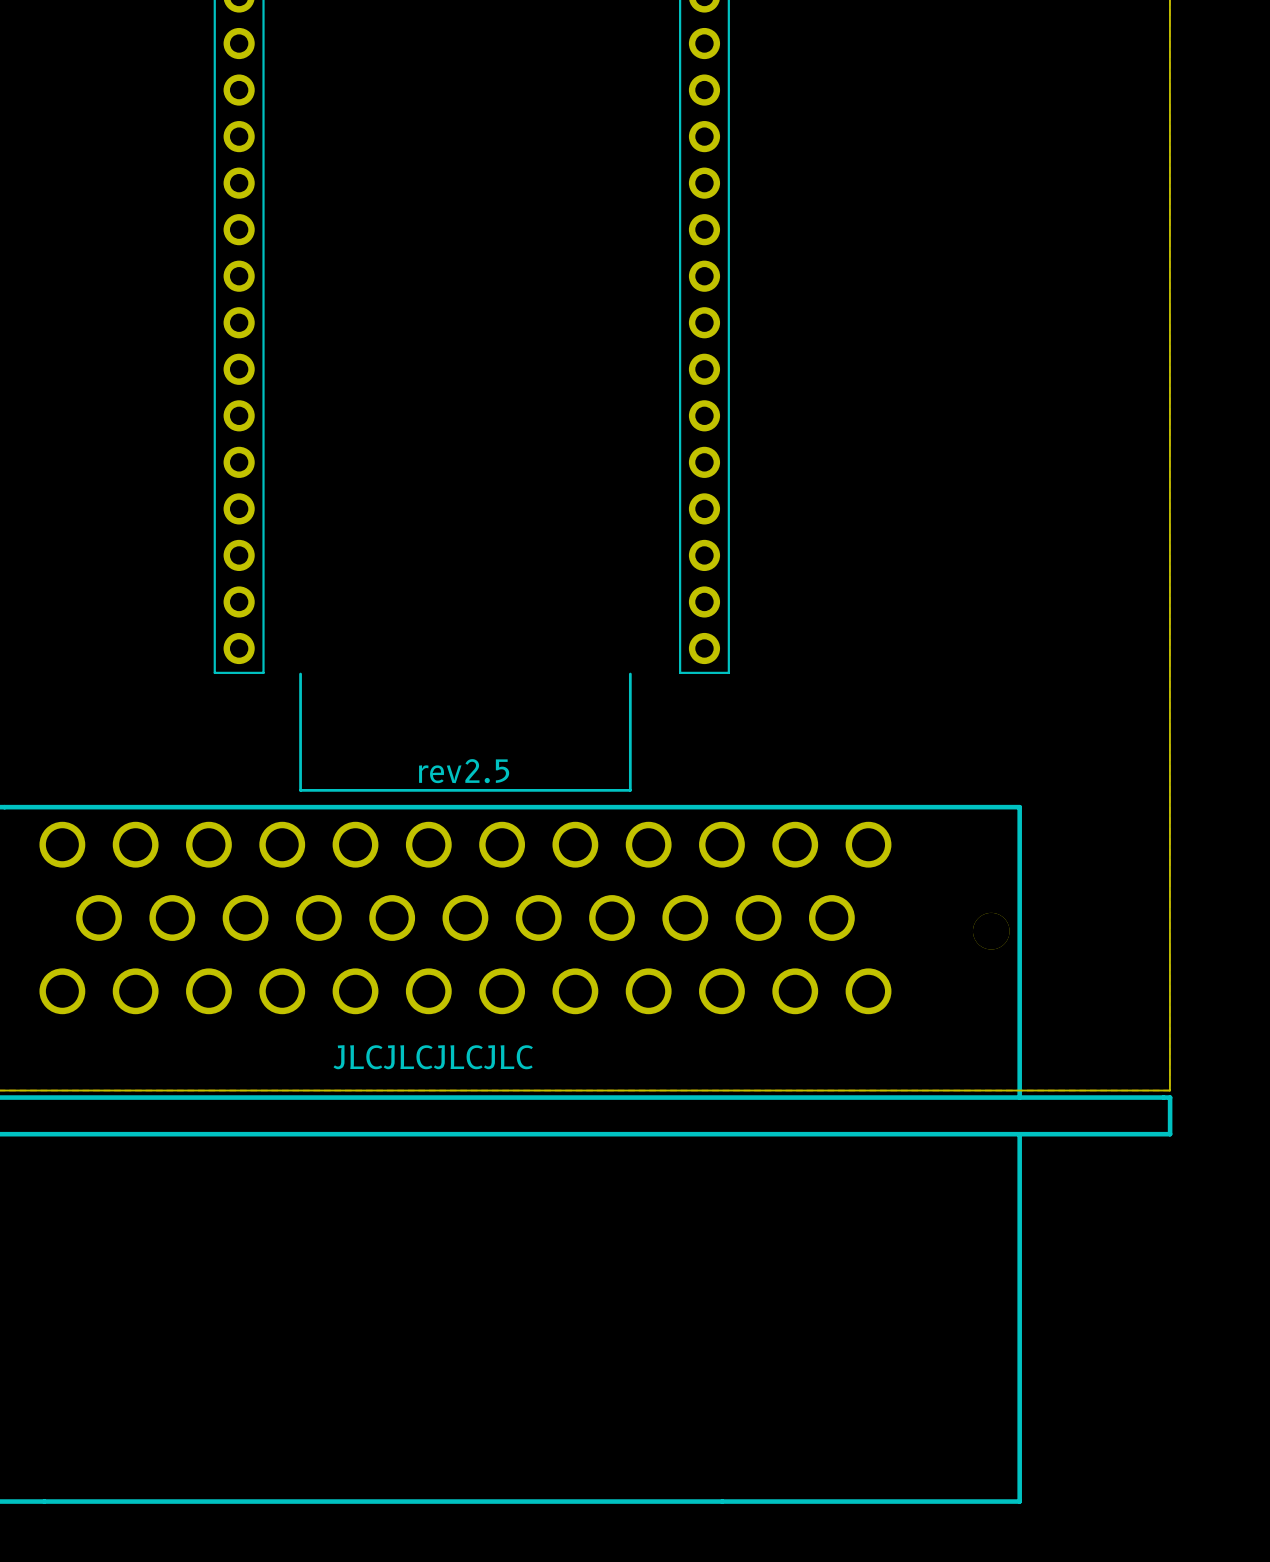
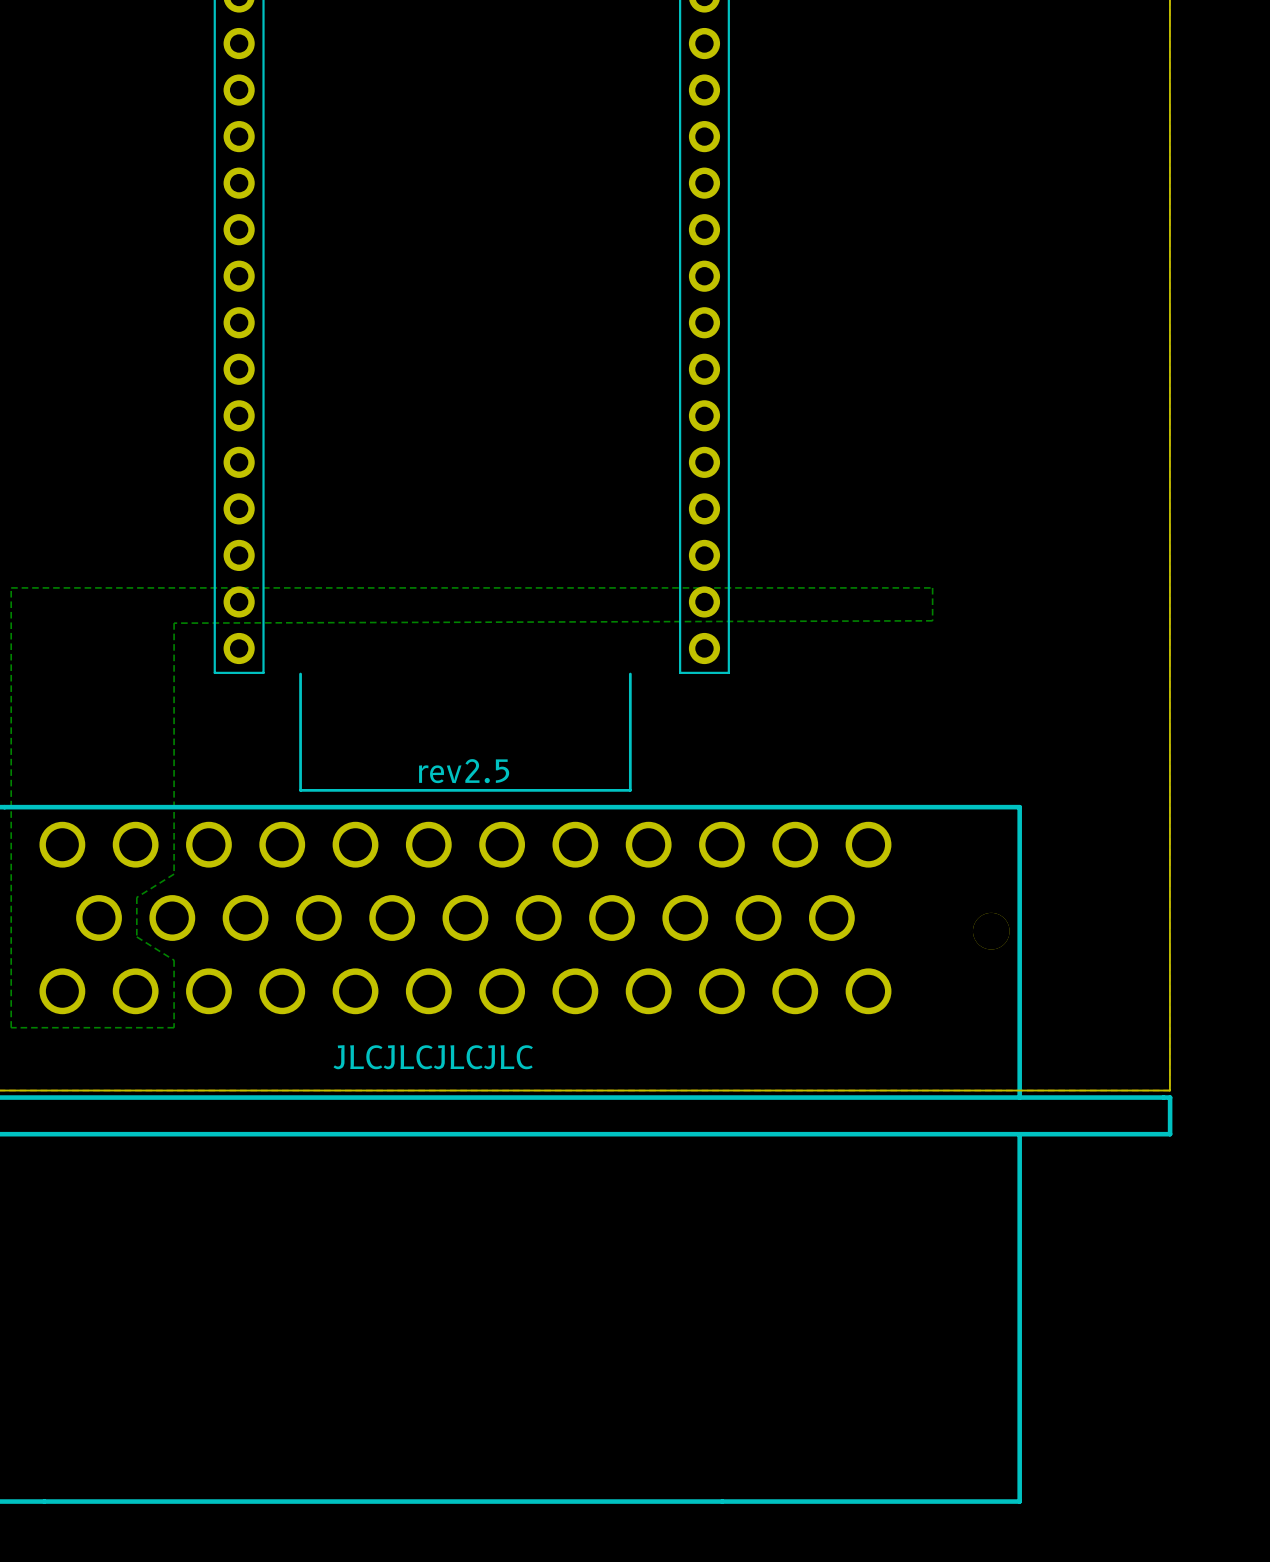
bottom zone outline: none -> (11, 587) (11, 1027) (174, 1027) (174, 960) (136, 936) (136, 897) (174, 874) (174, 623) (932, 620) (932, 587) (11, 587)

